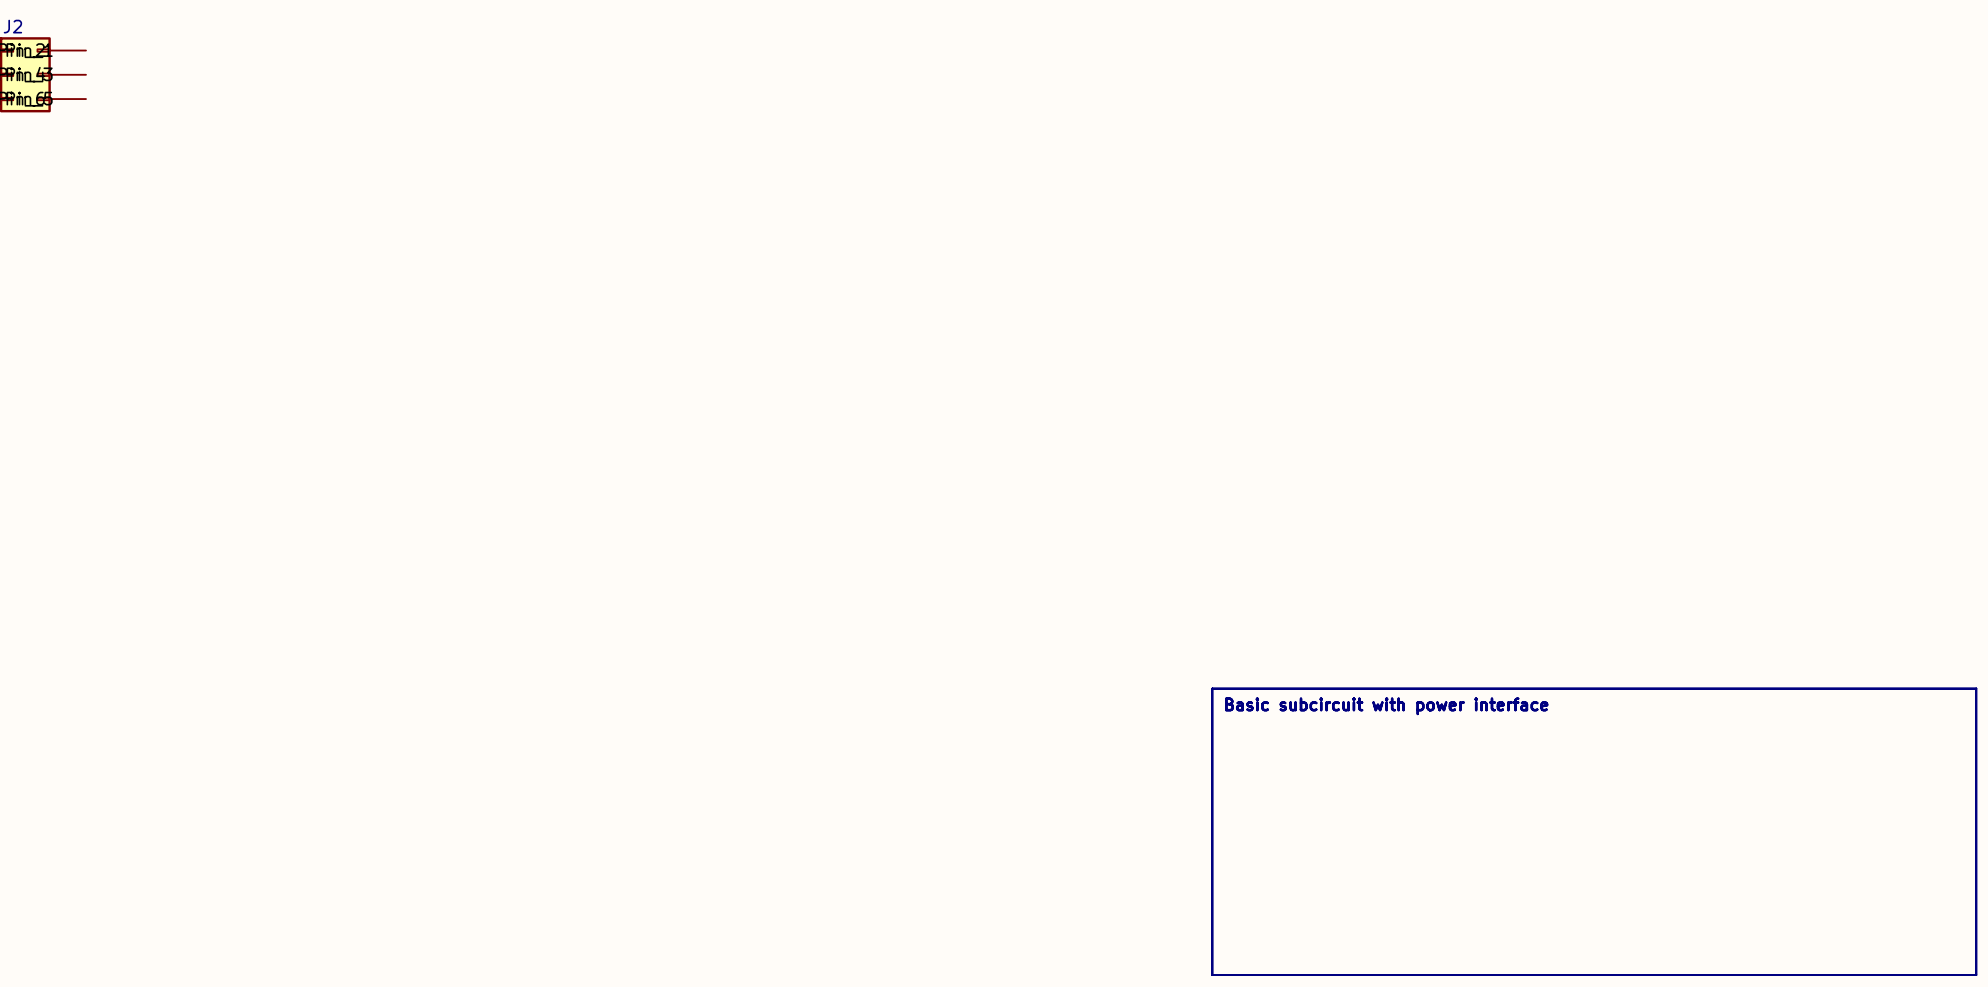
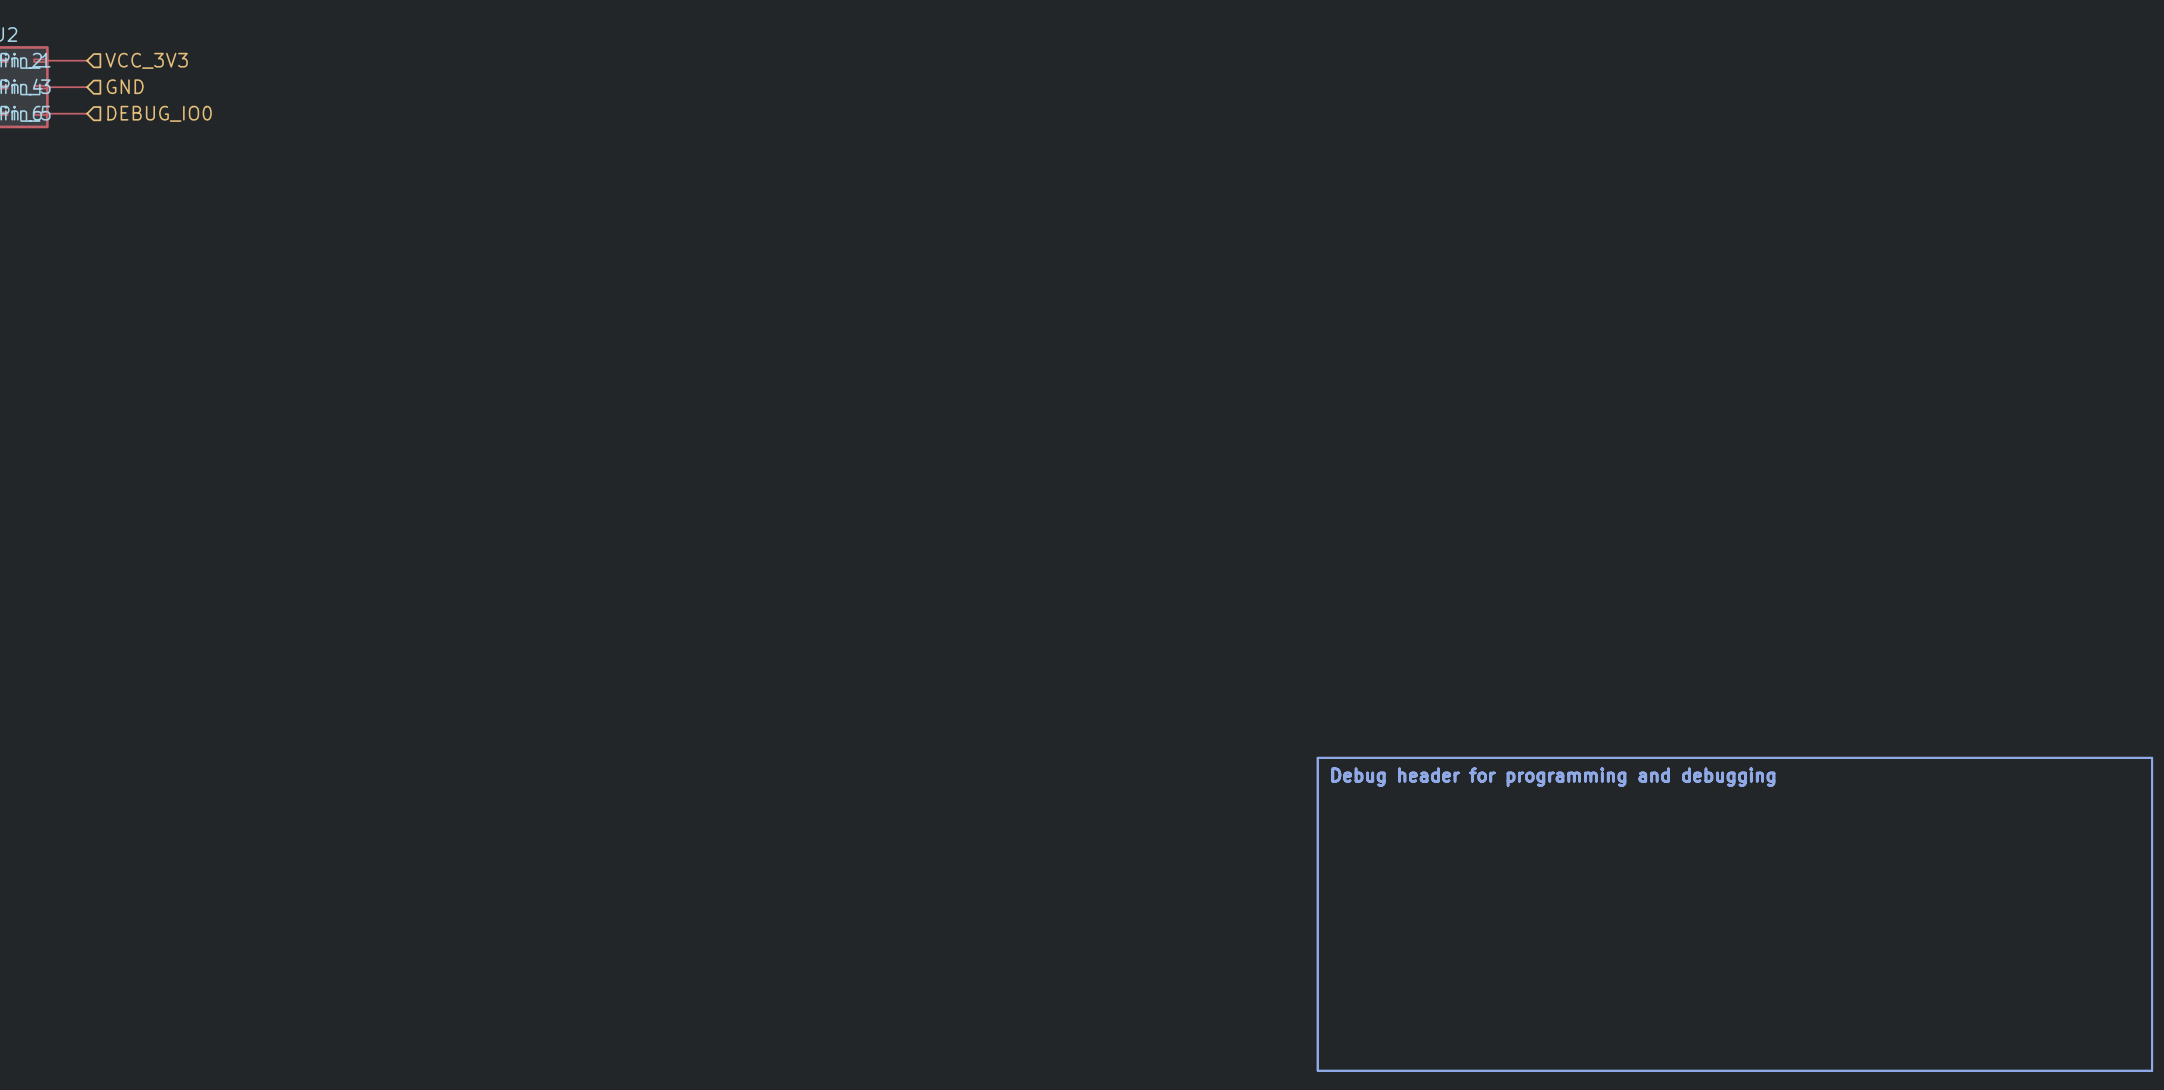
hierarchical label: none -> VCC_3V3 (146, 60)
hierarchical label: none -> GND (125, 86)
hierarchical label: none -> DEBUG_IO0 (159, 113)
text: Basic subcircuit with power interface (1386, 706) -> Debug header for programming and debugging (1553, 777)

